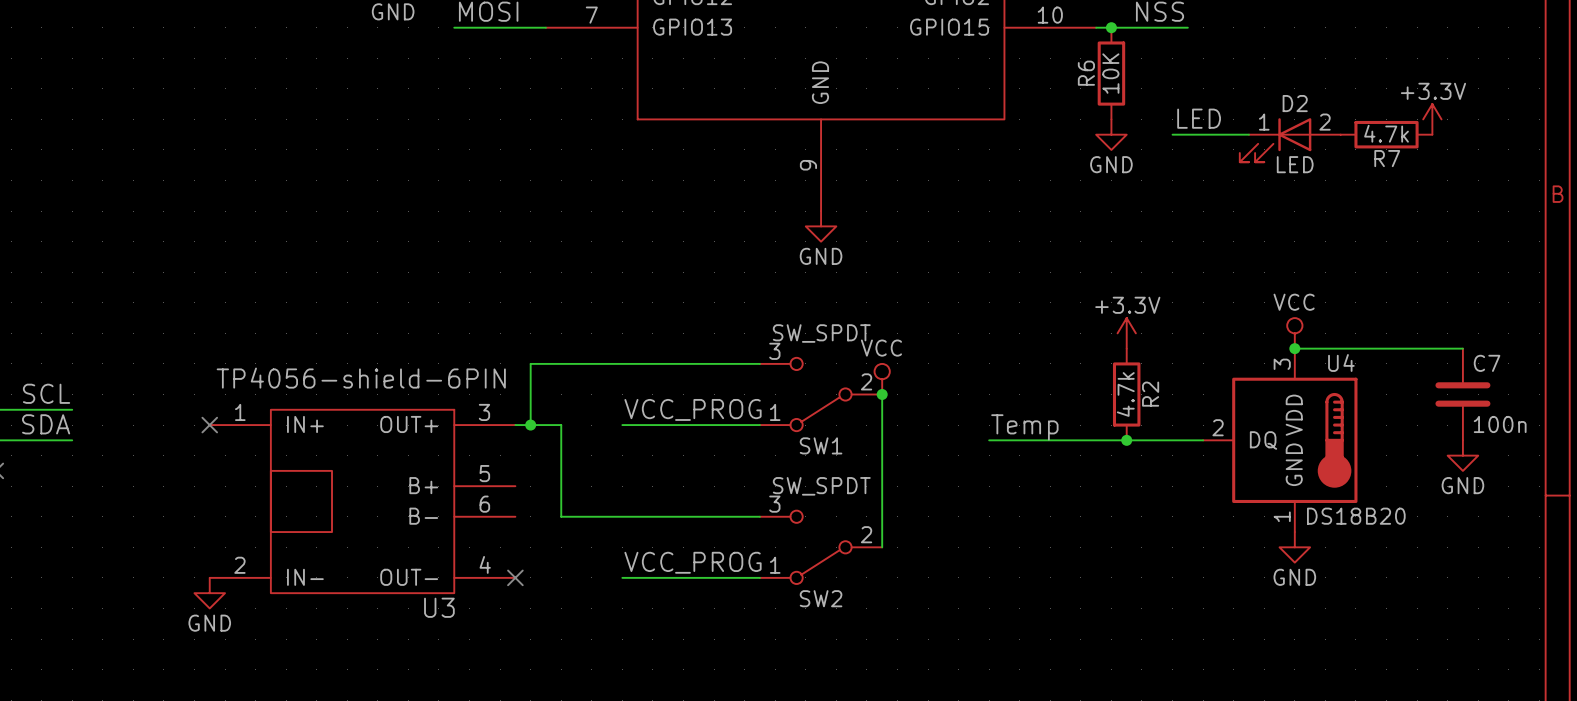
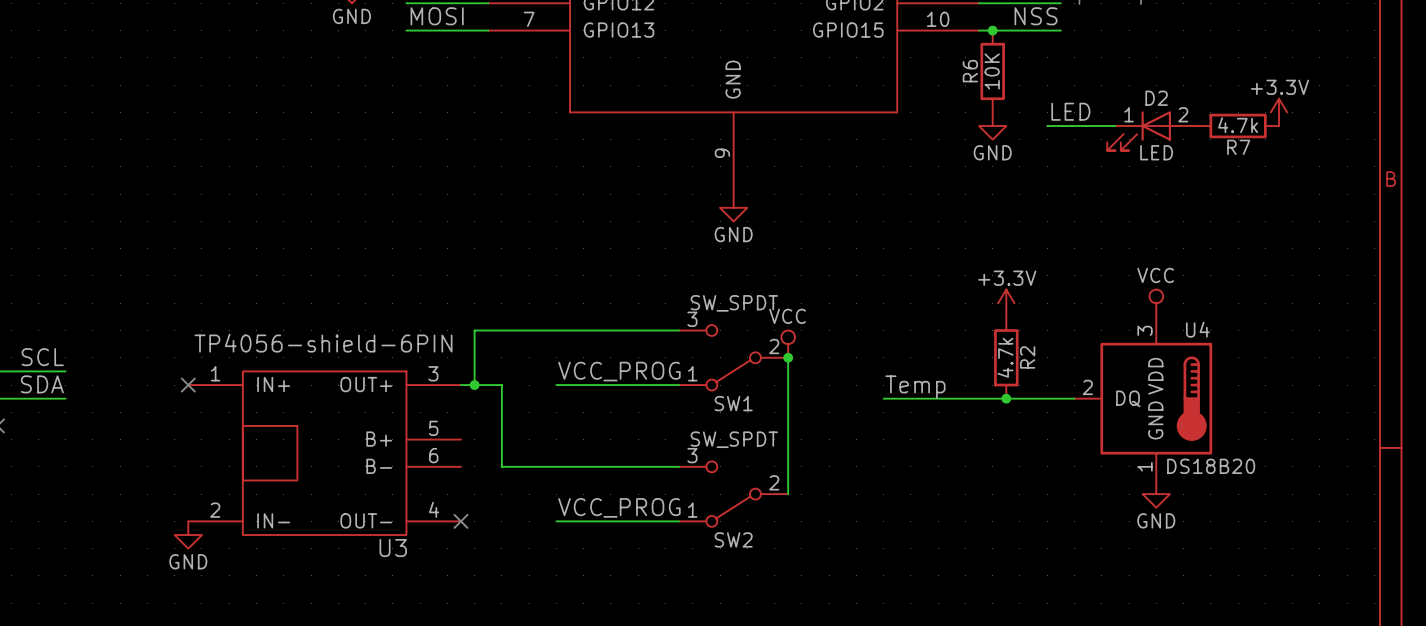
wire: (1294, 348) (1462, 348) -> none
junction: (1294, 348) -> none
C7: 100n (1462, 394) -> none
power symbol: GND (1462, 455) -> none

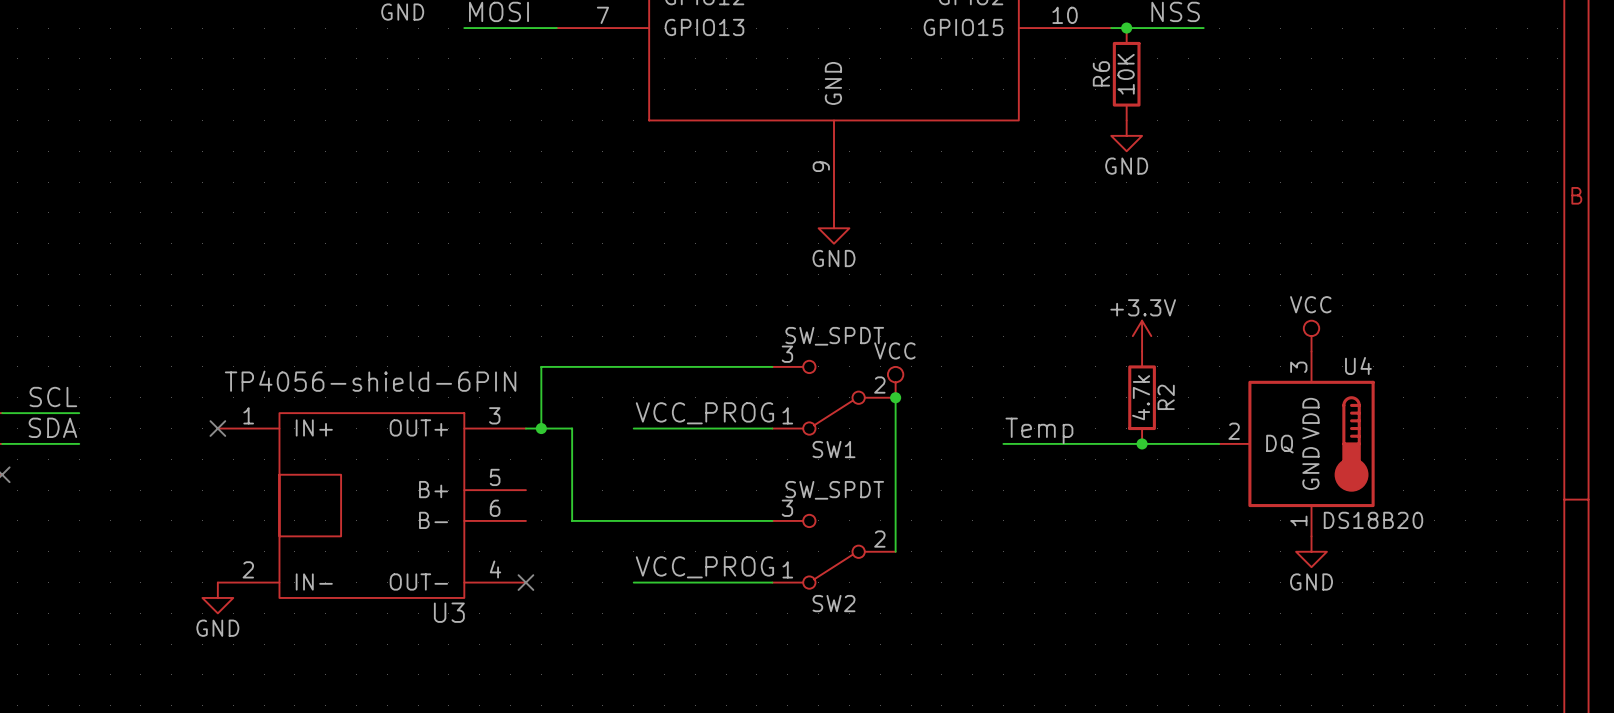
label: LED (1070, 111) -> none
power symbol: +3.3V (1278, 112) -> none
wire: (1047, 126) (1115, 126) -> none
R7: 4.7k (1238, 126) -> none
D2: LED (1152, 130) -> none

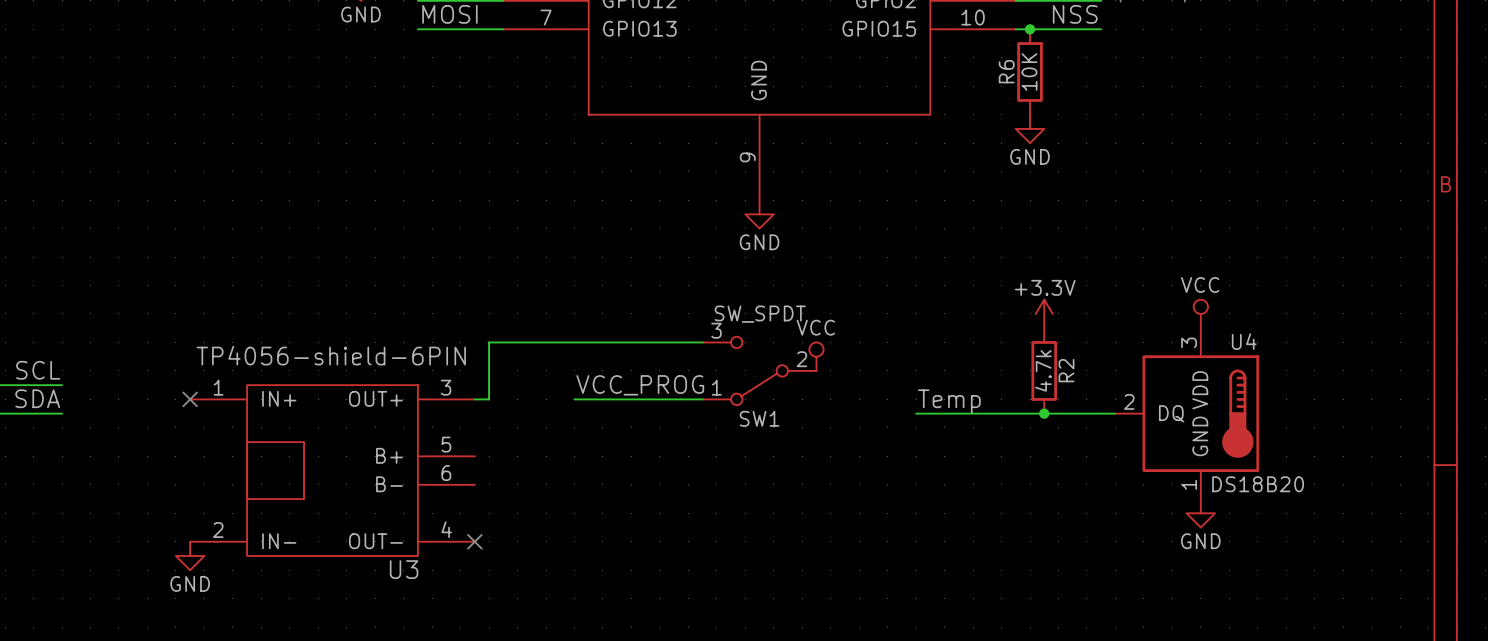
wire: (895, 397) (895, 551) -> none
junction: (895, 397) -> none
wire: (541, 428) (572, 428) (572, 520) (772, 520) -> none
junction: (541, 428) -> none
SW2: SW_SPDT (834, 551) -> none
label: VCC_PROG (704, 567) -> none
wire: (633, 582) (772, 582) -> none

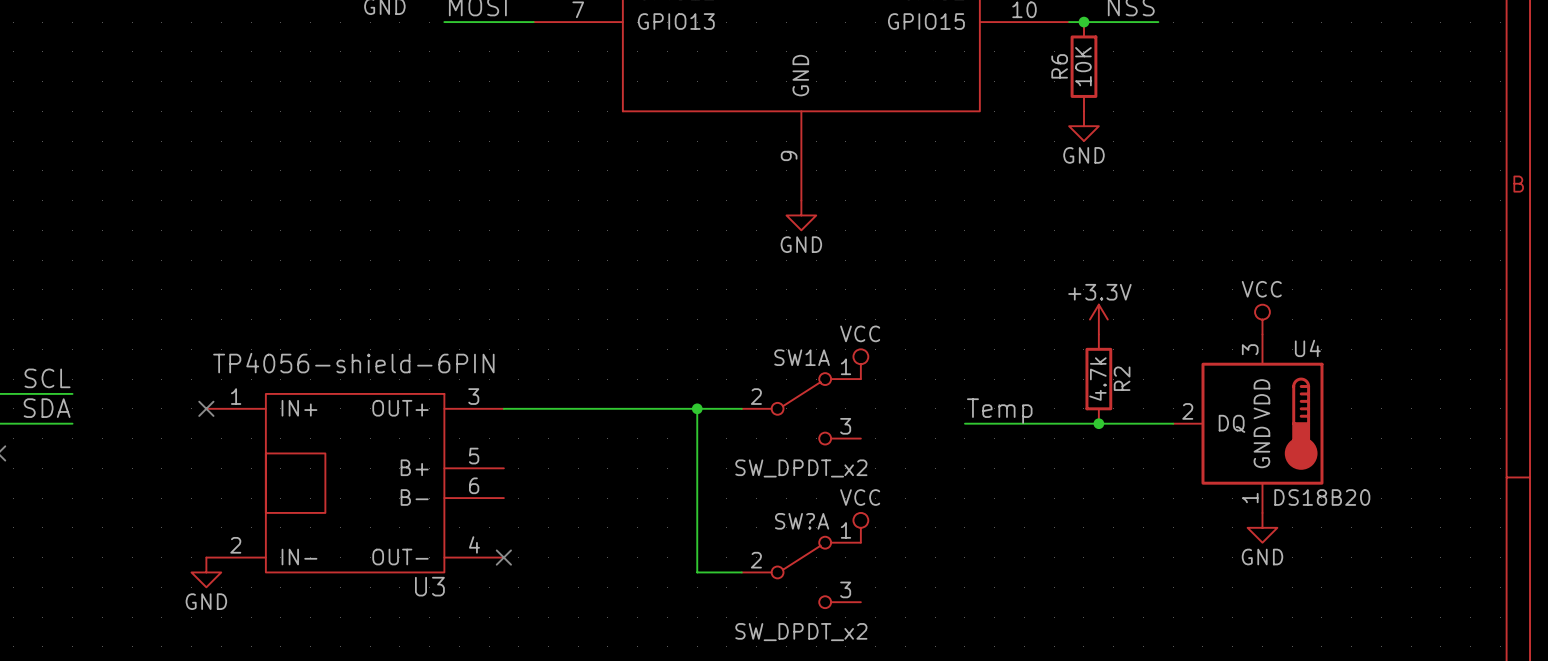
wire: (702, 342) (489, 342) (489, 399) -> (607, 408) (518, 408)
SW1: SW_SPDT (759, 370) -> none
label: VCC_PROG (640, 385) -> none
wire: none -> (697, 408) (697, 572) (741, 572)
junction: none -> (697, 408)
SW1A: none -> SW_DPDT_x2 (801, 408)
power symbol: none -> VCC (860, 527)
SW?A: none -> SW_DPDT_x2 (801, 572)

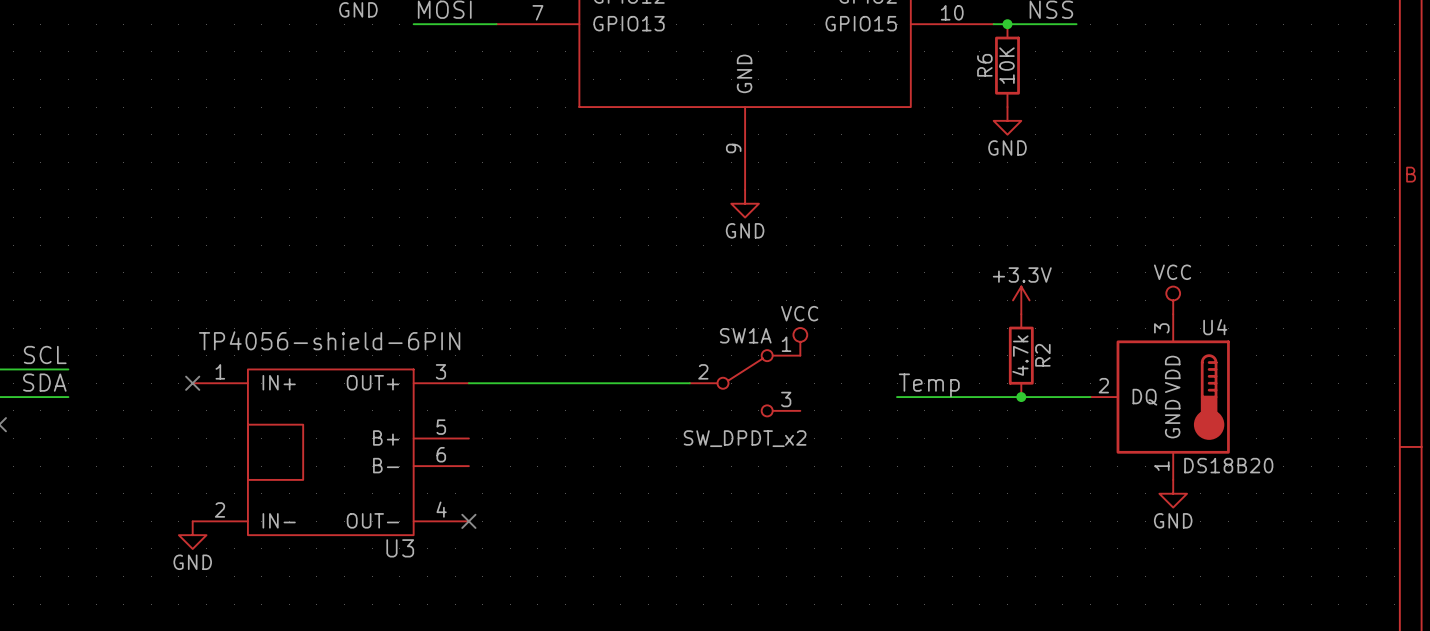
wire: (697, 408) (697, 572) (741, 572) -> none
junction: (697, 408) -> none
power symbol: VCC (860, 527) -> none
SW?A: SW_DPDT_x2 (801, 572) -> none

